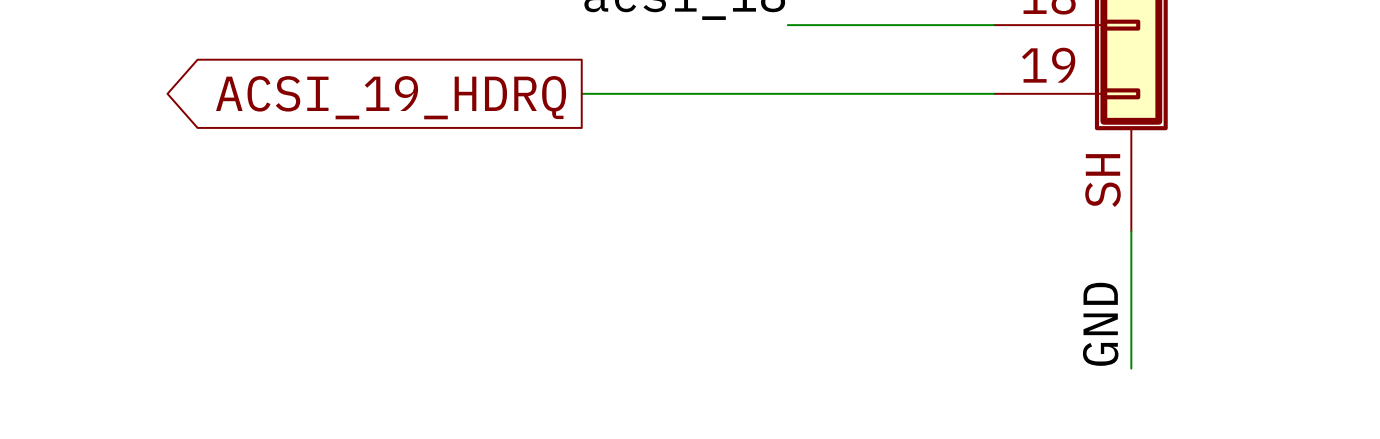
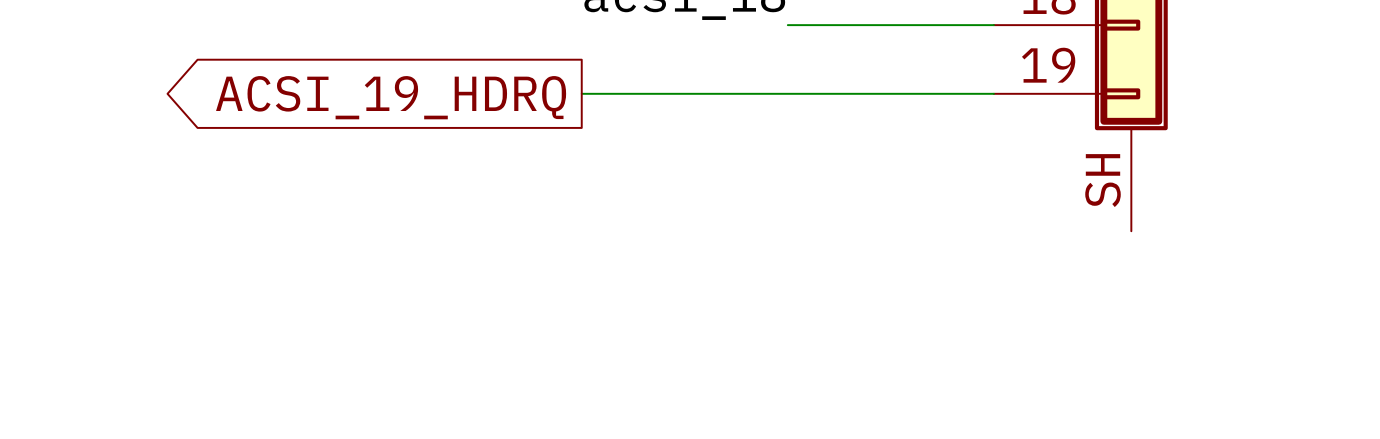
wire: (1131, 231) (1131, 368) -> none
label: GND (1100, 324) -> none

